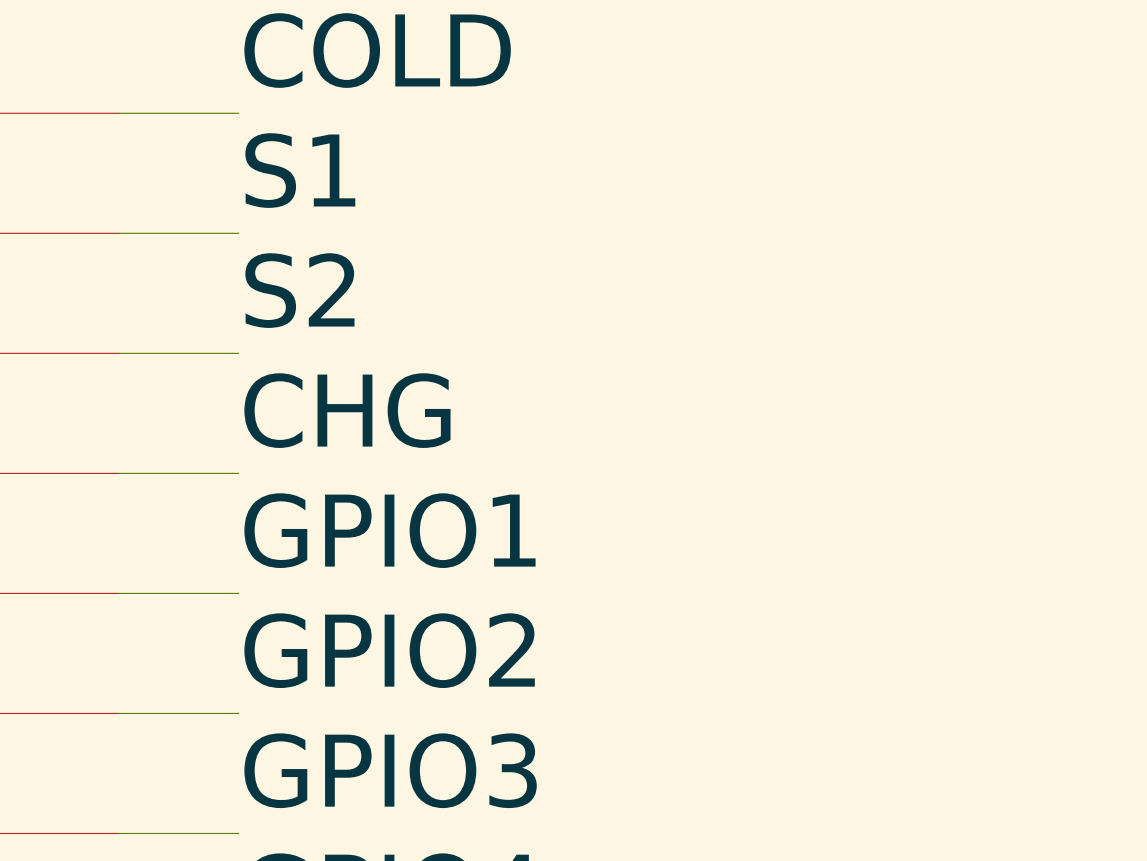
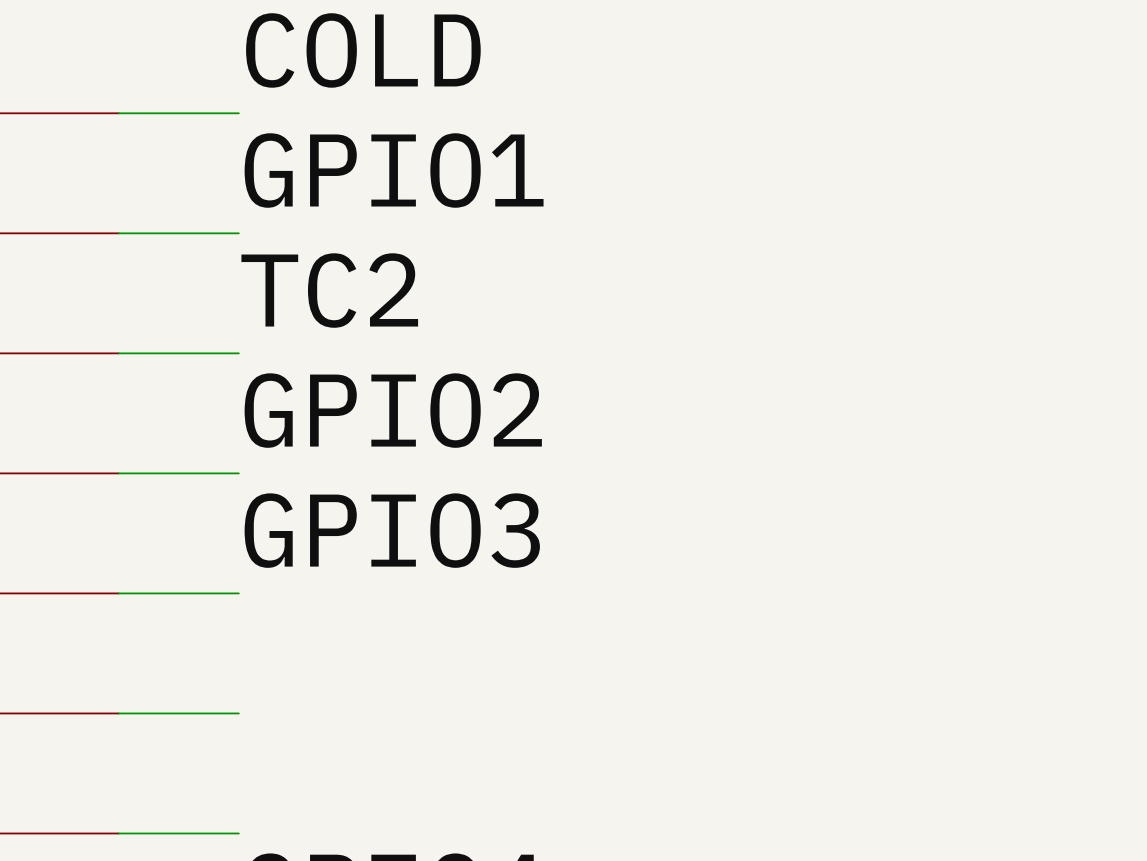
label: S1 (300, 170) -> GPIO1 (394, 170)
label: S2 (299, 290) -> TC2 (329, 290)
label: CHG (347, 410) -> GPIO2 (393, 410)
label: GPIO1 (389, 530) -> GPIO3 (392, 530)
label: GPIO2 (389, 650) -> none
label: GPIO3 (390, 770) -> none

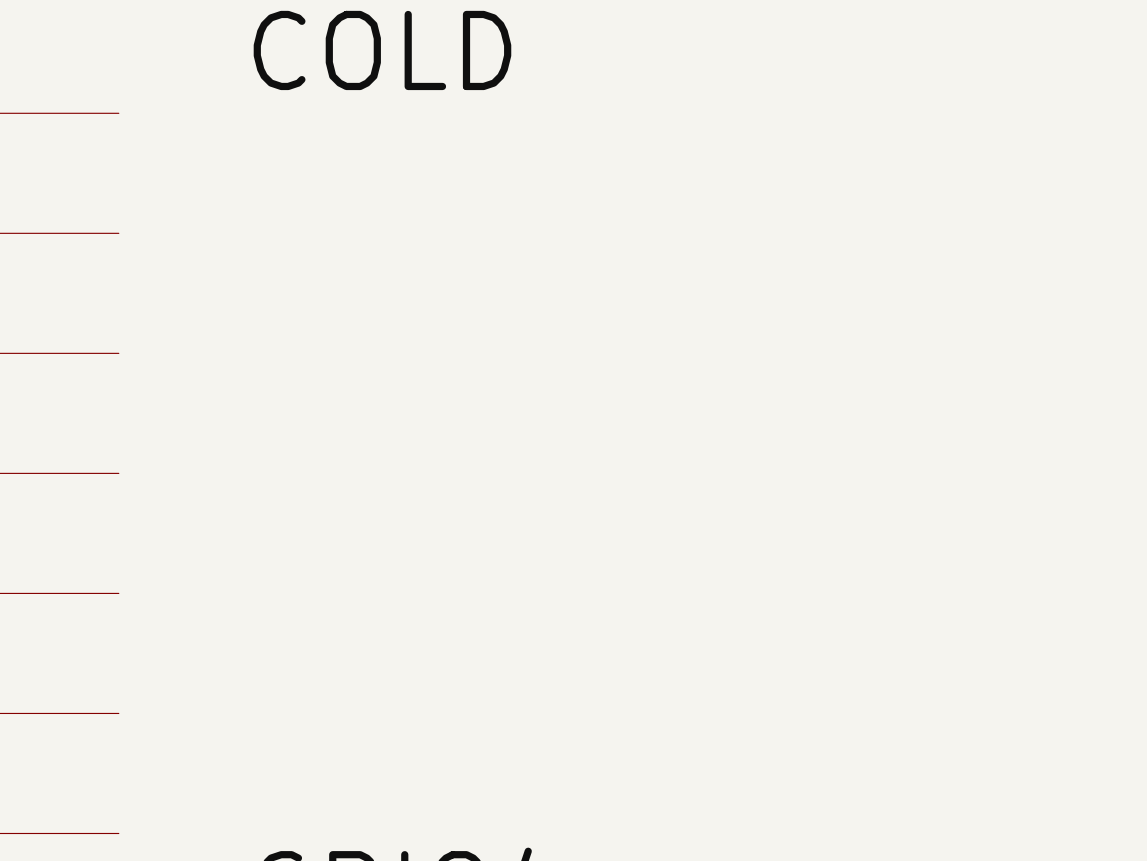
wire: (118, 113) (238, 113) -> none
label: GPIO1 (394, 170) -> none
wire: (118, 233) (238, 233) -> none
label: TC2 (329, 290) -> none
wire: (118, 353) (238, 353) -> none
label: GPIO2 (393, 410) -> none
wire: (118, 473) (238, 473) -> none
label: GPIO3 (392, 530) -> none
wire: (118, 593) (238, 593) -> none
wire: (118, 713) (238, 713) -> none
wire: (118, 833) (238, 833) -> none

